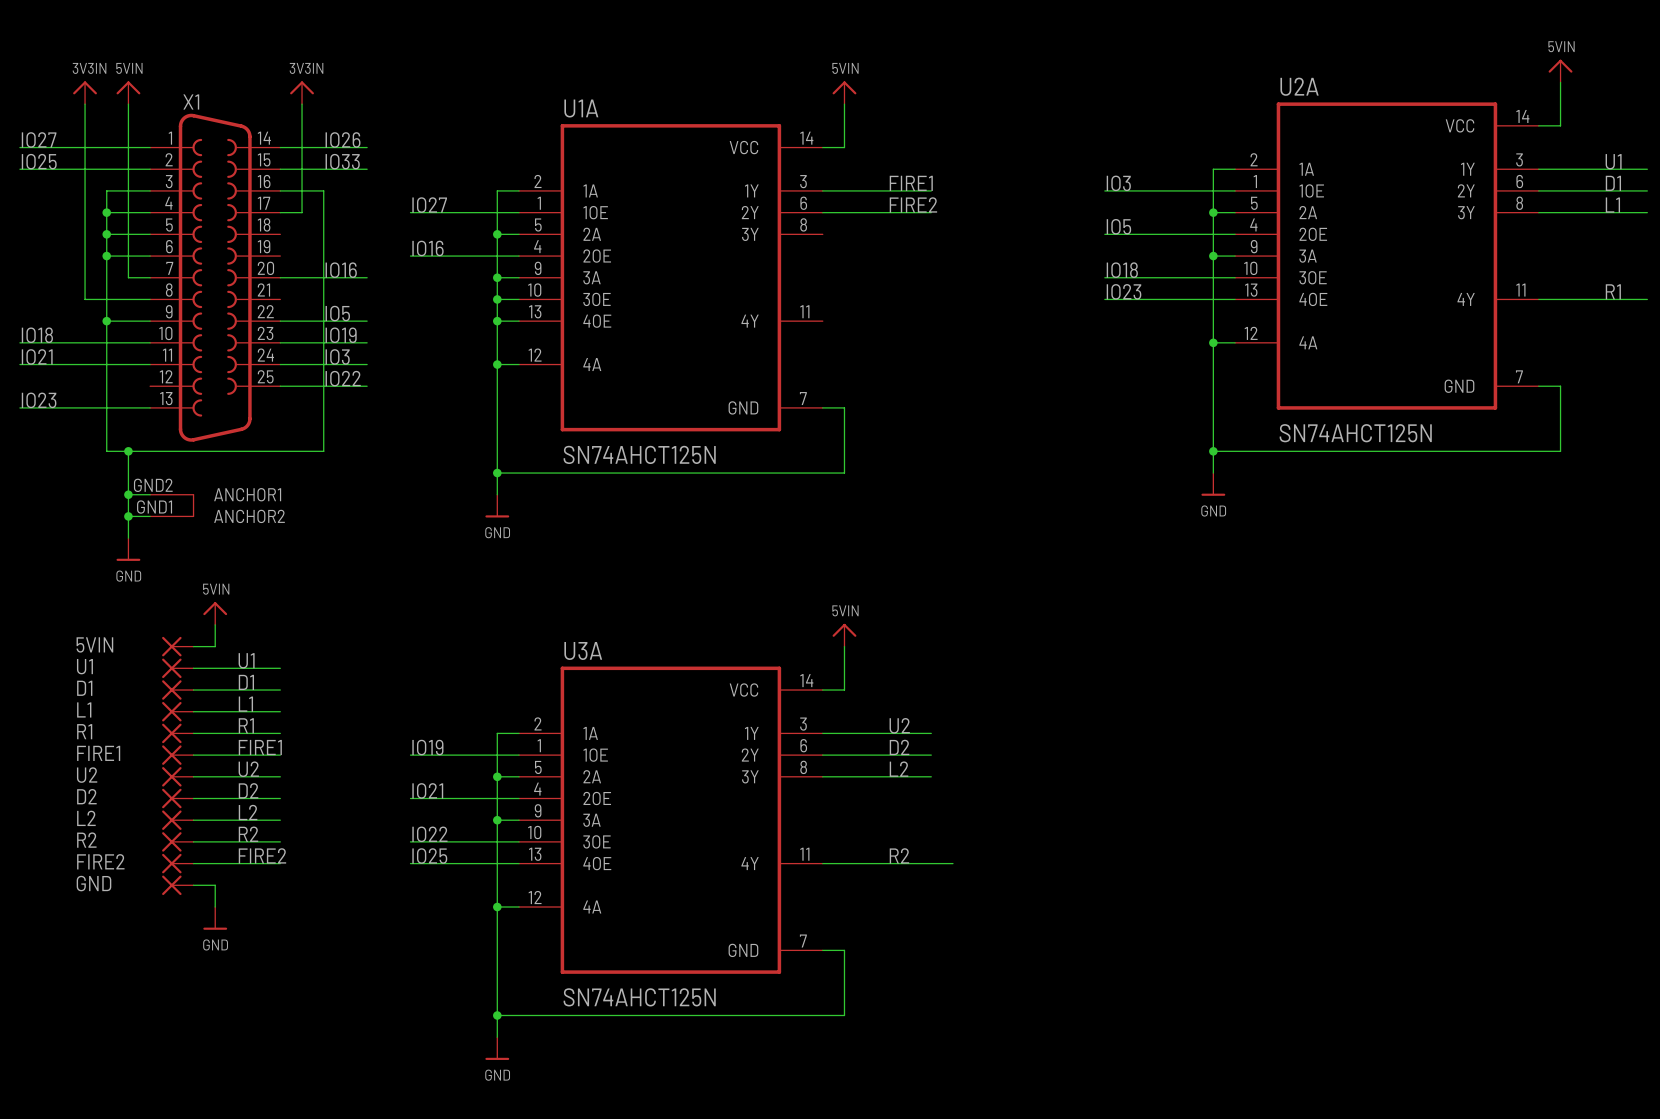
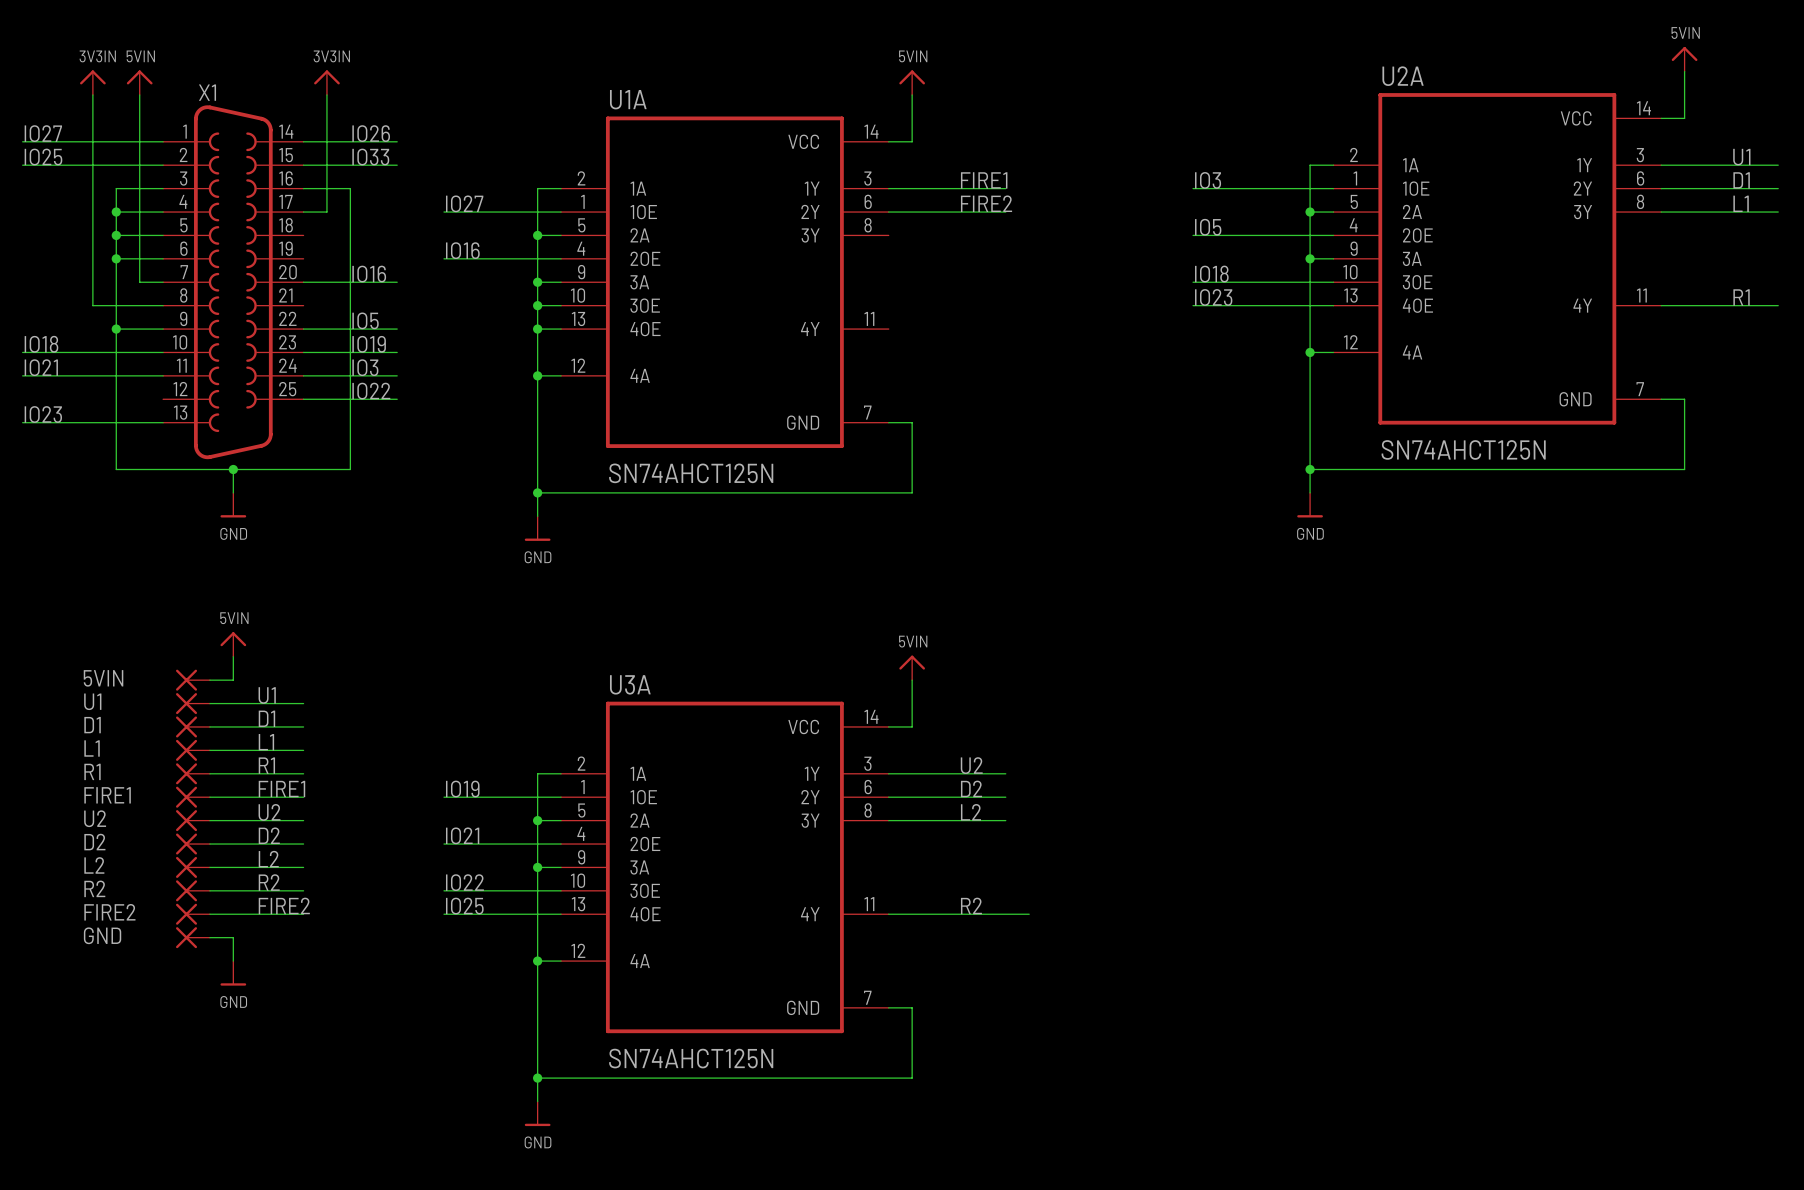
X1 symbol: [150, 113, 281, 518] -> [163, 105, 304, 460]
wire: (128, 451) (128, 538) -> none
junction: (128, 451) -> none
wire: none -> (233, 469) (233, 492)
junction: none -> (233, 469)
wire: (128, 494) (150, 494) -> none
junction: (128, 494) -> none
wire: (128, 516) (150, 516) -> none
junction: (128, 516) -> none
power symbol position: GND (128, 549) -> GND (233, 505)

